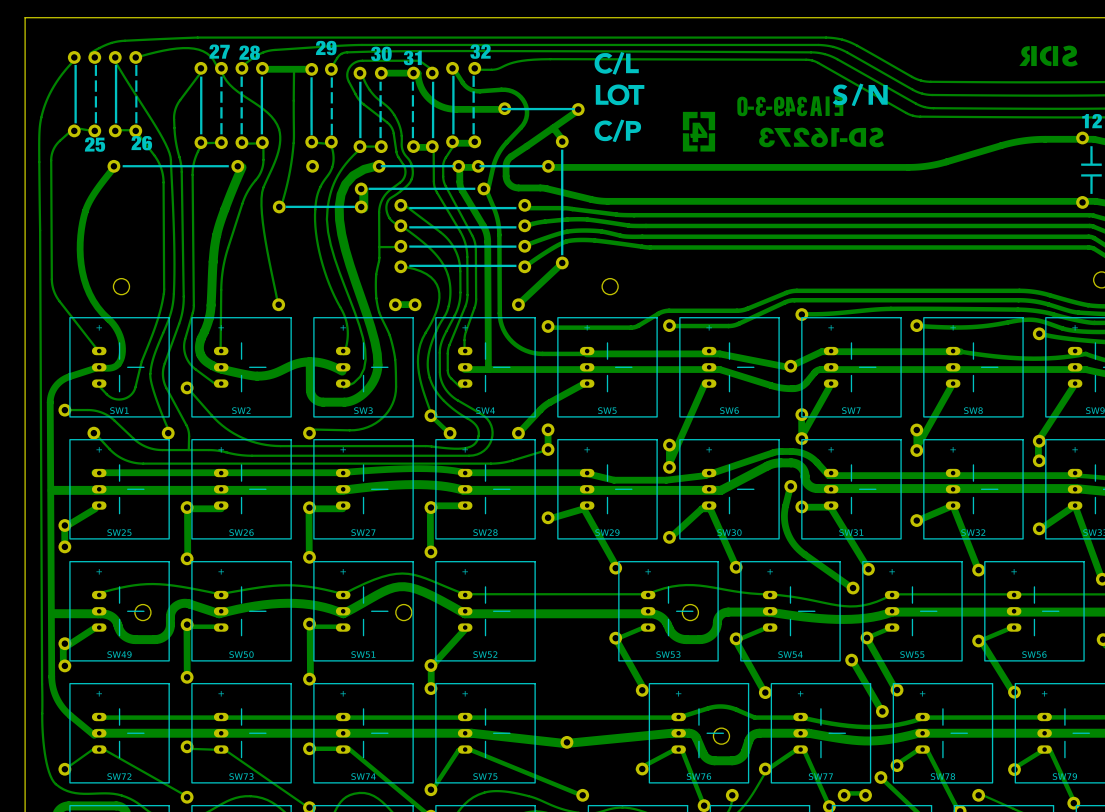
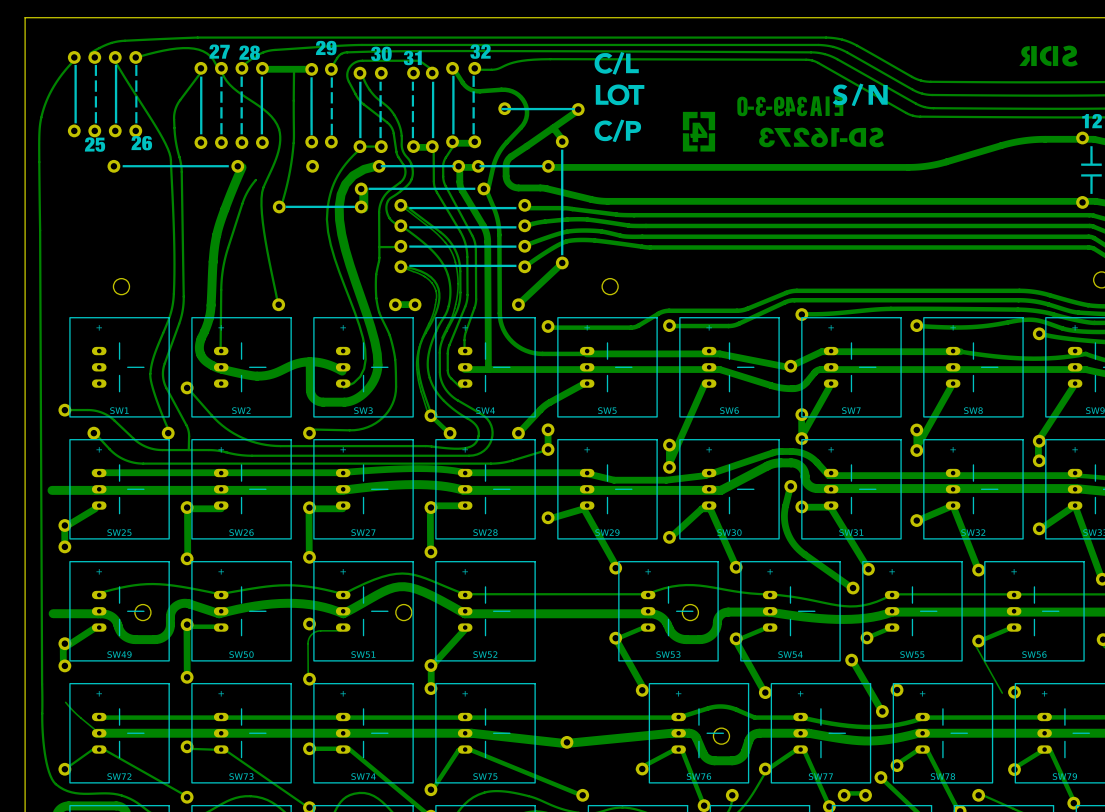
bottom track: (383, 73) (418, 73) (419, 83) (424, 93) (434, 103) (444, 107) (506, 109) -> none
bottom track: (119, 130) (135, 130) (156, 158) (162, 171) (164, 292) (157, 320) (141, 361) (132, 393) (125, 398) (114, 398) (108, 395) (96, 383) -> none
bottom track: (96, 131) (74, 127) (57, 142) (52, 152) (51, 279) (57, 298) (99, 351) -> none
bottom track: (223, 142) (202, 143) (193, 164) (193, 306) (184, 345) (185, 355) (190, 364) (216, 385) -> none
bottom track: (313, 142) (330, 144) (333, 153) (331, 168) (317, 195) (315, 220) (317, 245) (324, 271) (346, 322) (347, 337) (343, 354) -> none
bottom track: (245, 143) (263, 143) (262, 166) (255, 180) -> none
bottom track: (116, 164) (95, 192) (86, 208) (81, 228) (80, 249) (82, 271) (86, 286) (97, 307) (118, 333) (122, 345) (121, 357) (118, 363) (113, 367) (99, 367) (63, 379) (54, 388) (50, 400) (52, 682) (55, 695) (62, 707) (94, 735) -> none
bottom track: none -> (400, 205) (437, 234) (447, 245) (454, 258) (457, 278) (456, 299) (452, 317) (441, 338)
bottom track: none -> (400, 266) (426, 277) (433, 284) (436, 292) (434, 309) (419, 345) (416, 361) (419, 386) (429, 417)
bottom track: (310, 626) (342, 626) -> none
bottom track: (310, 627) (310, 678) -> none
bottom track: none -> (340, 630) (317, 631) (309, 636) (308, 643) (308, 681)
bottom track: (867, 639) (894, 687) -> (975, 644) (1002, 693)
bottom track: (981, 641) (1011, 690) -> none
bottom track: none -> (65, 702) (96, 730)

